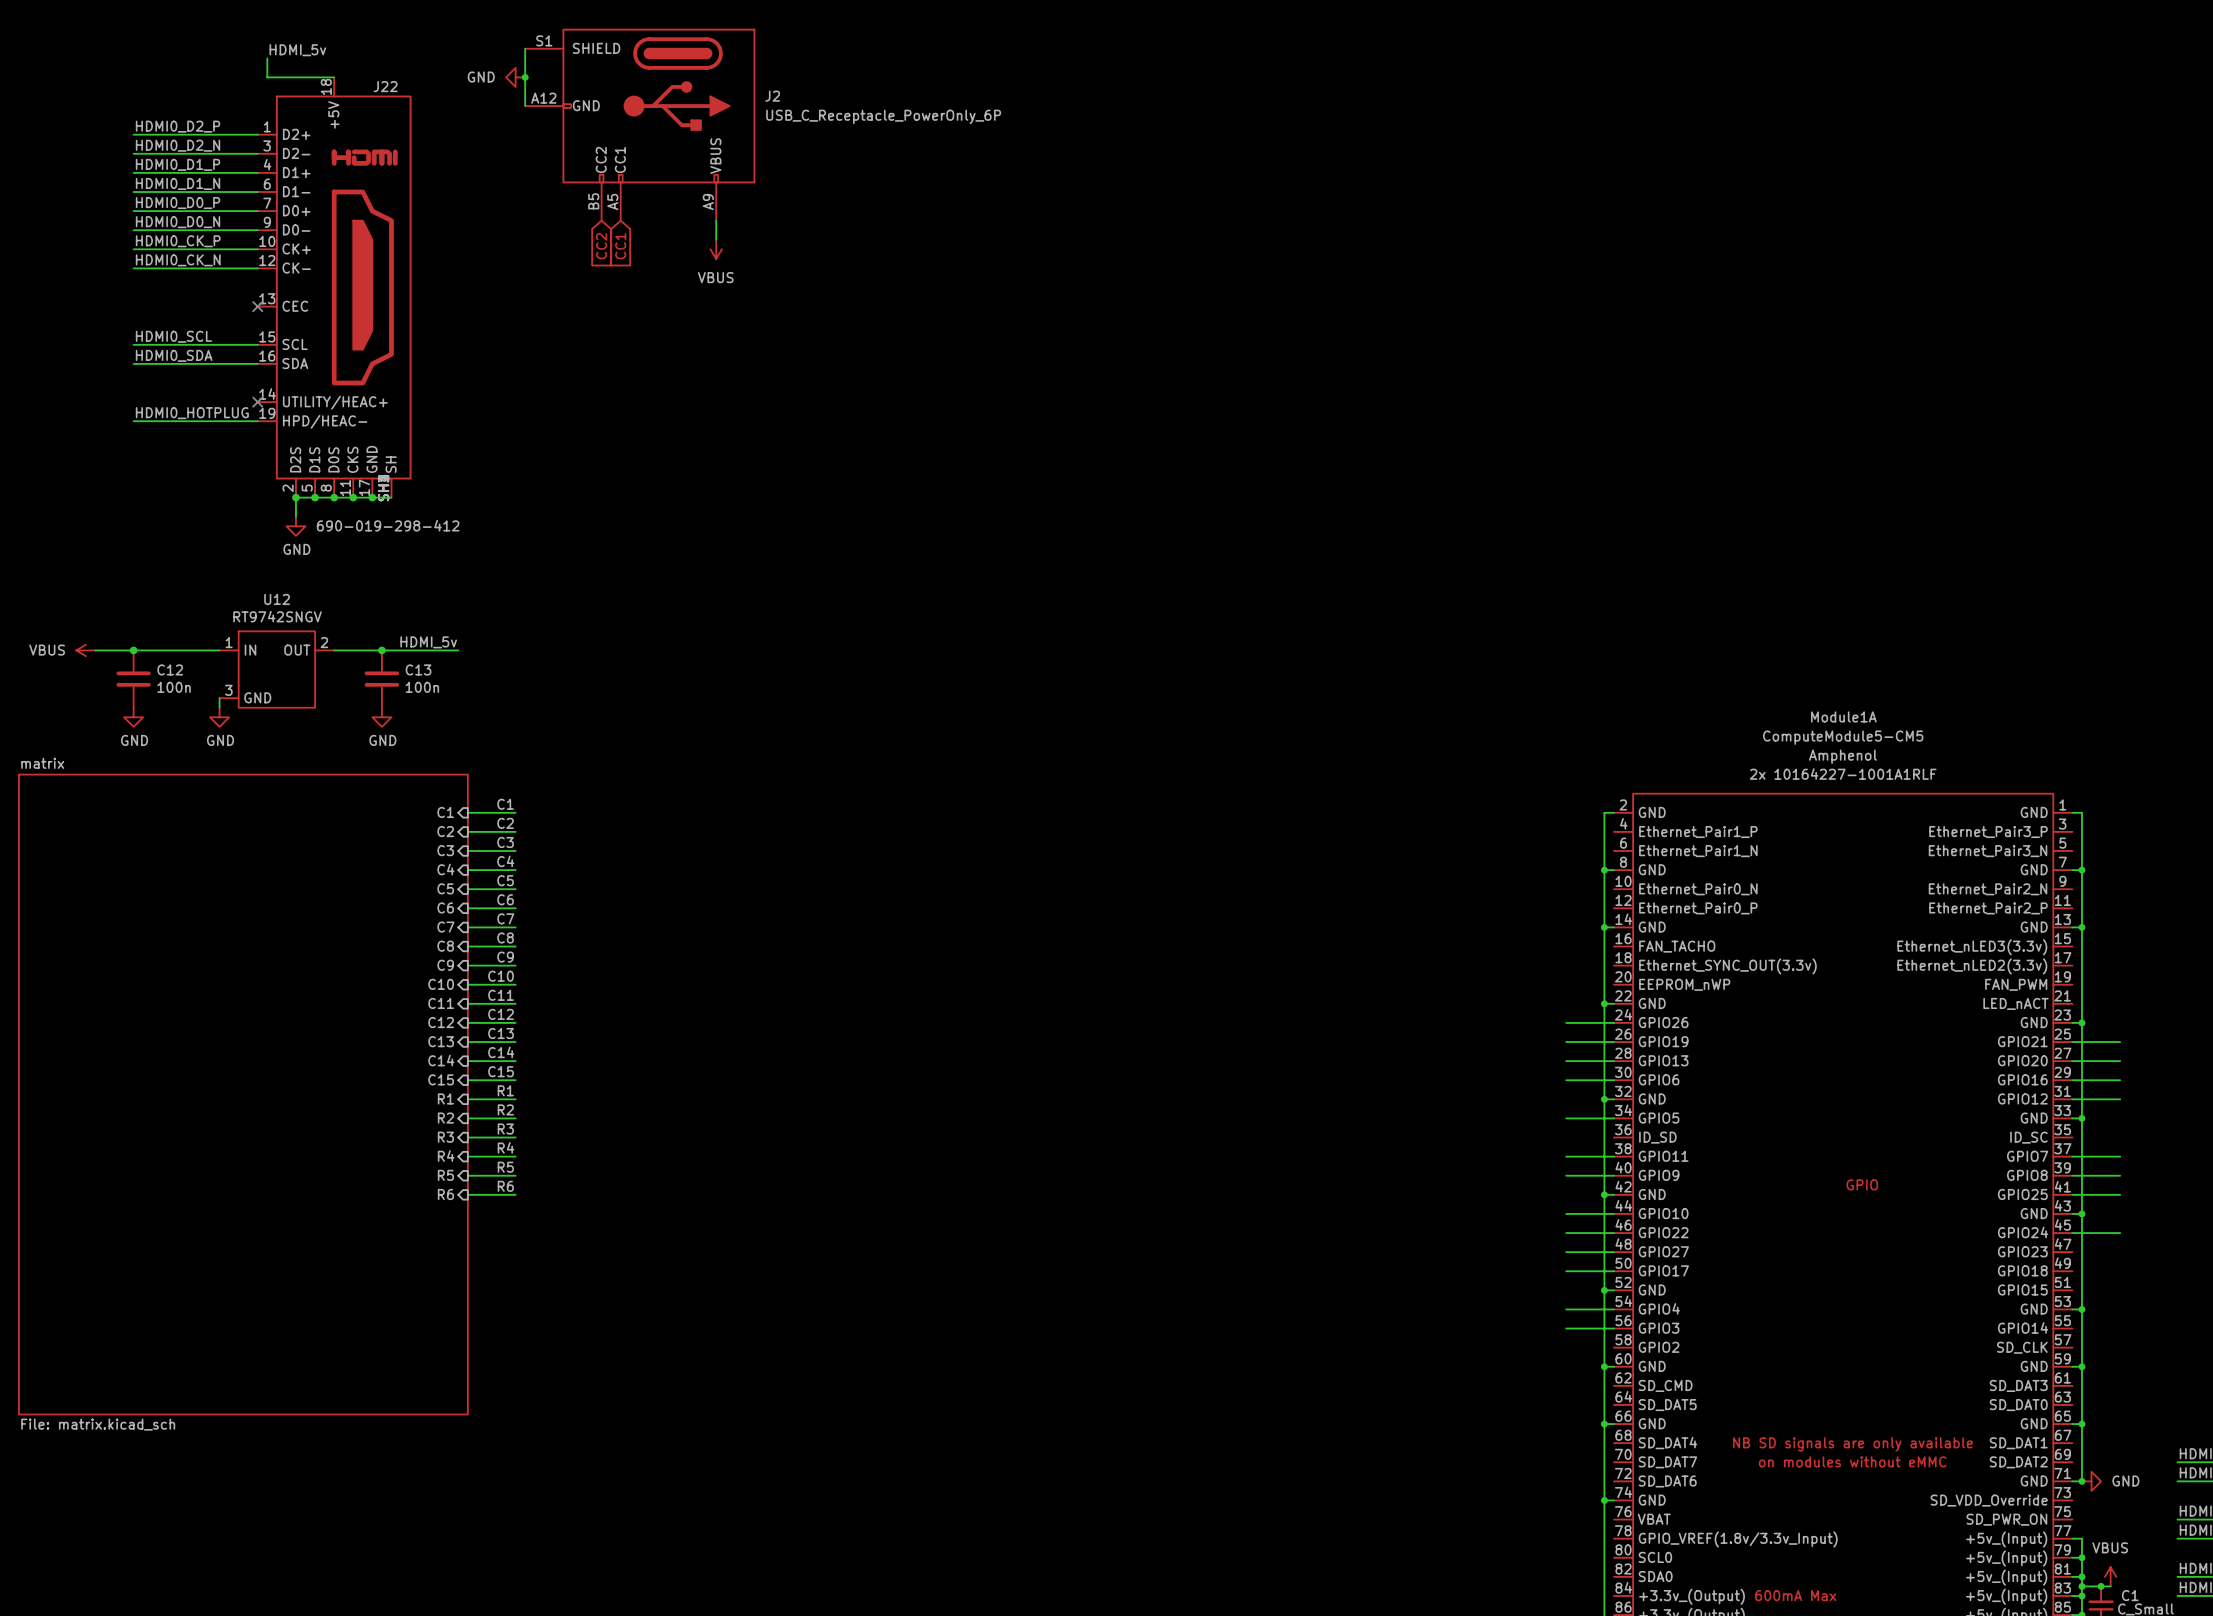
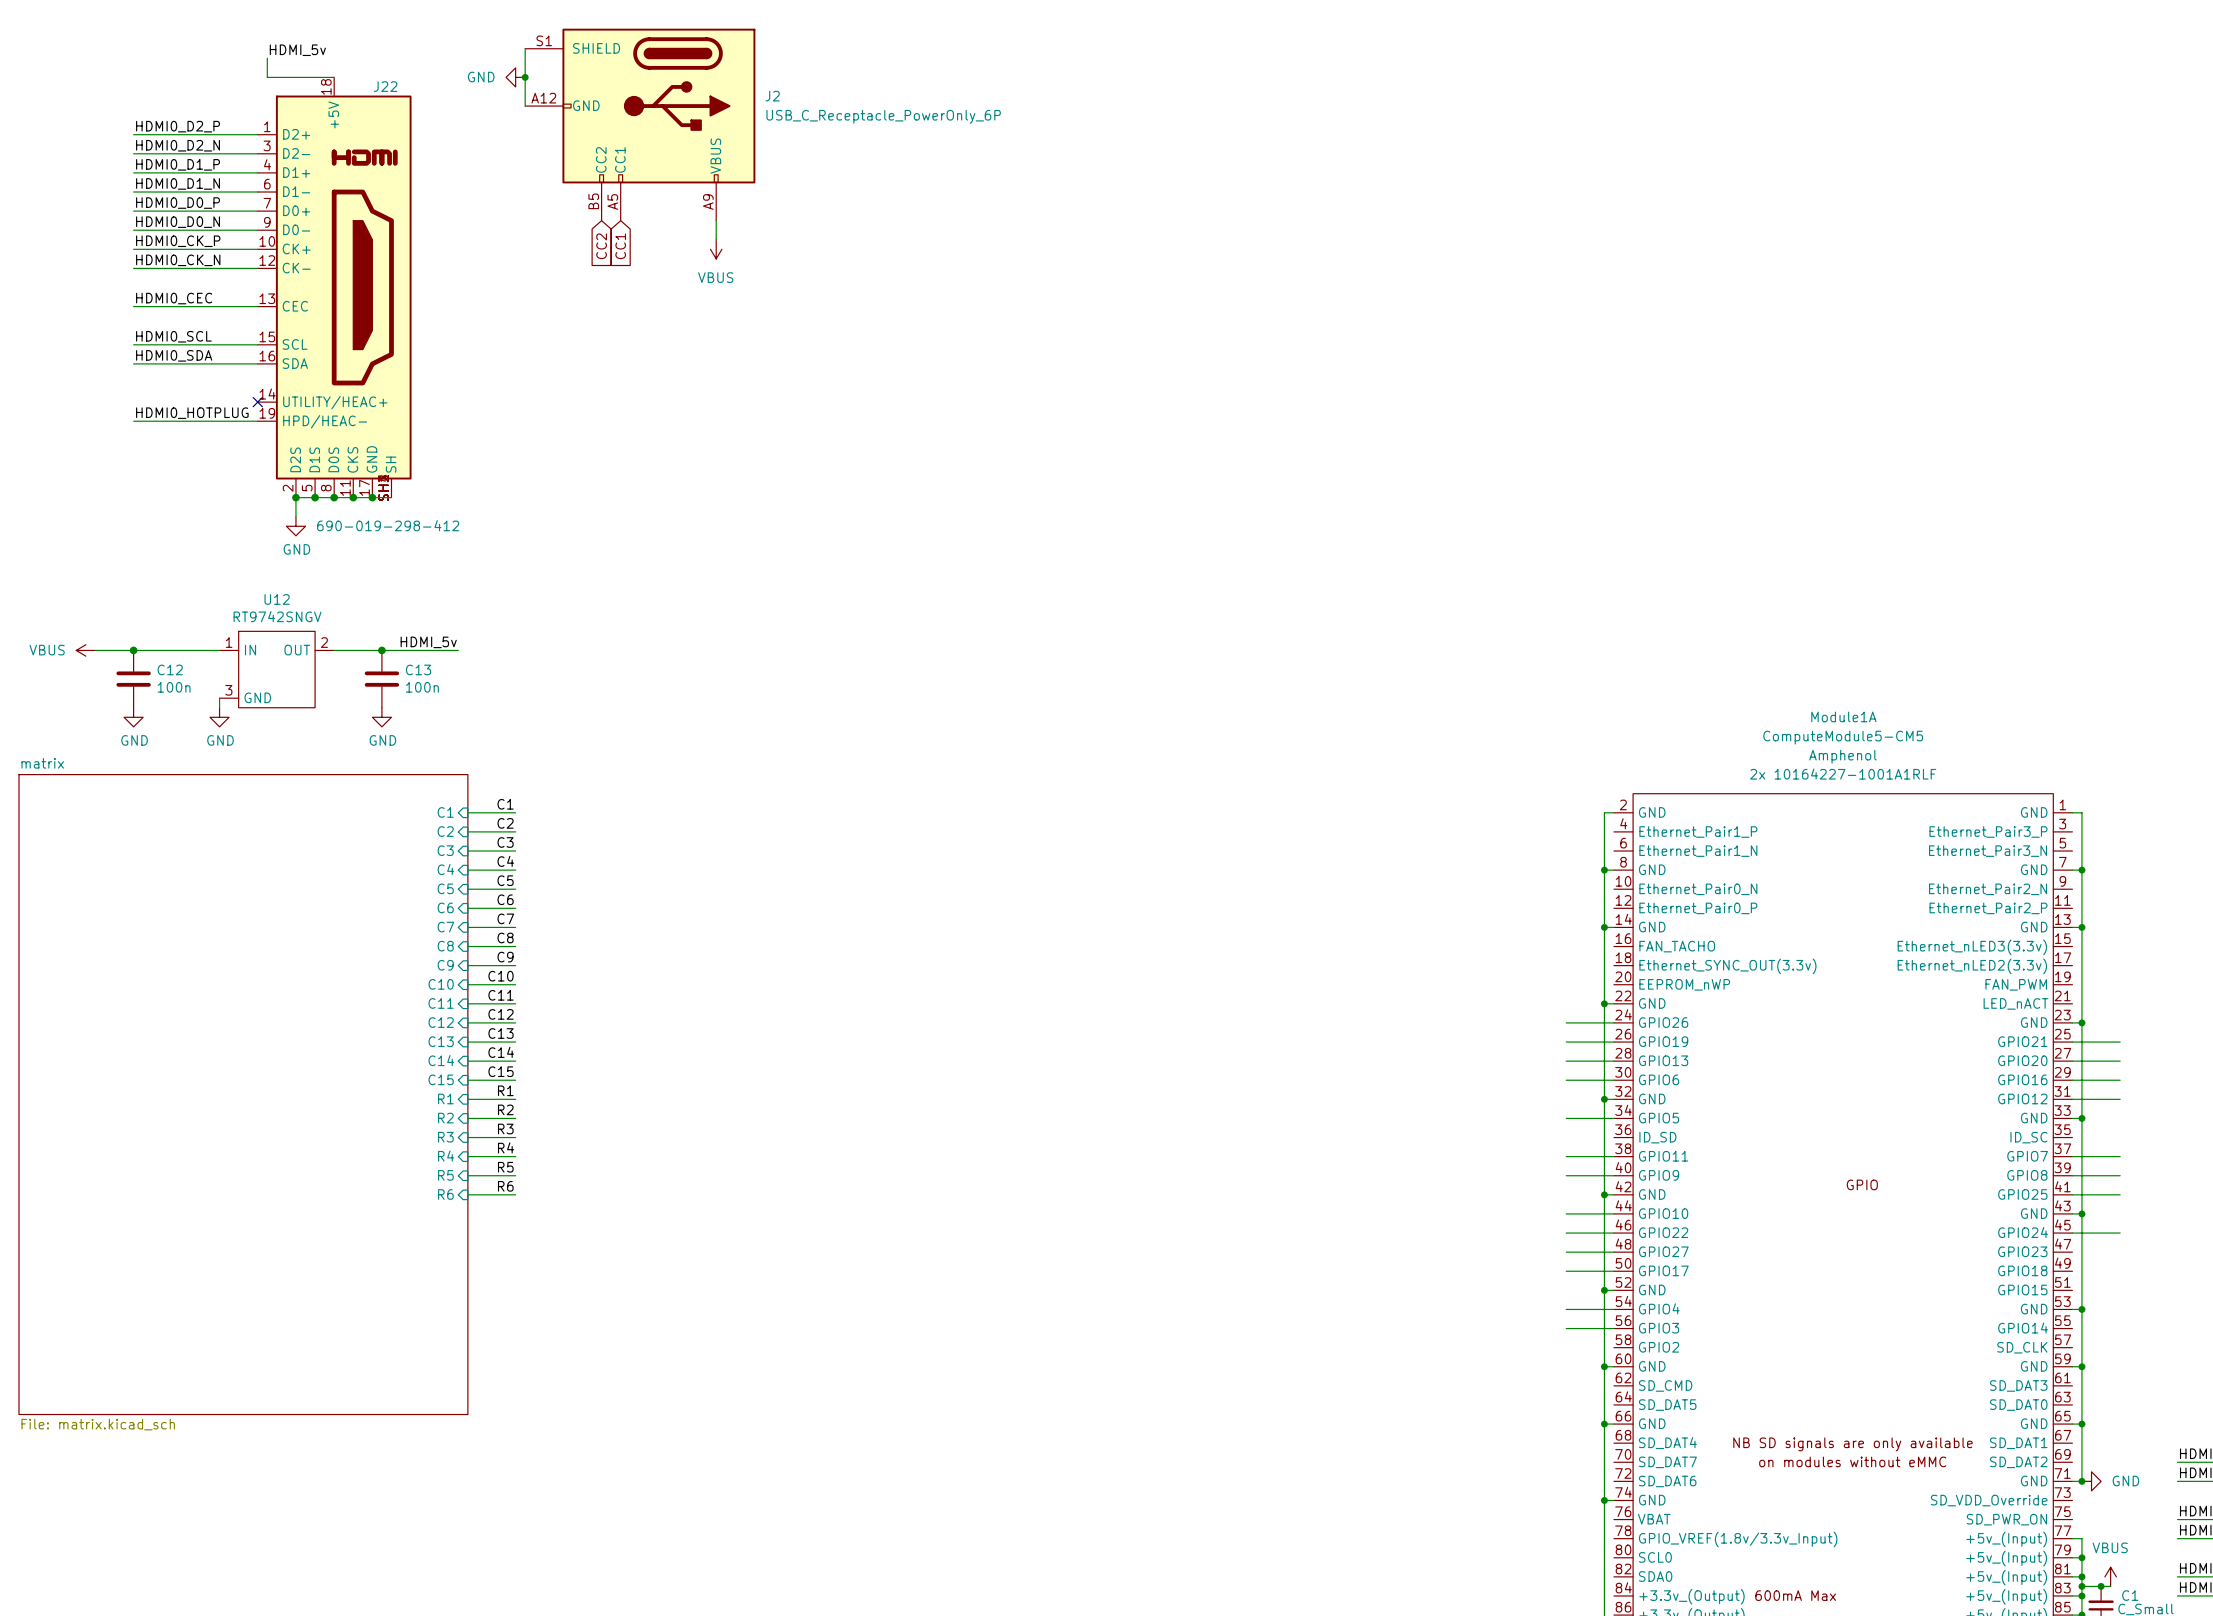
label: none -> HDMI0_CEC (174, 298)
wire: none -> (133, 306) (257, 306)
no-connect mark: (257, 306) -> none

